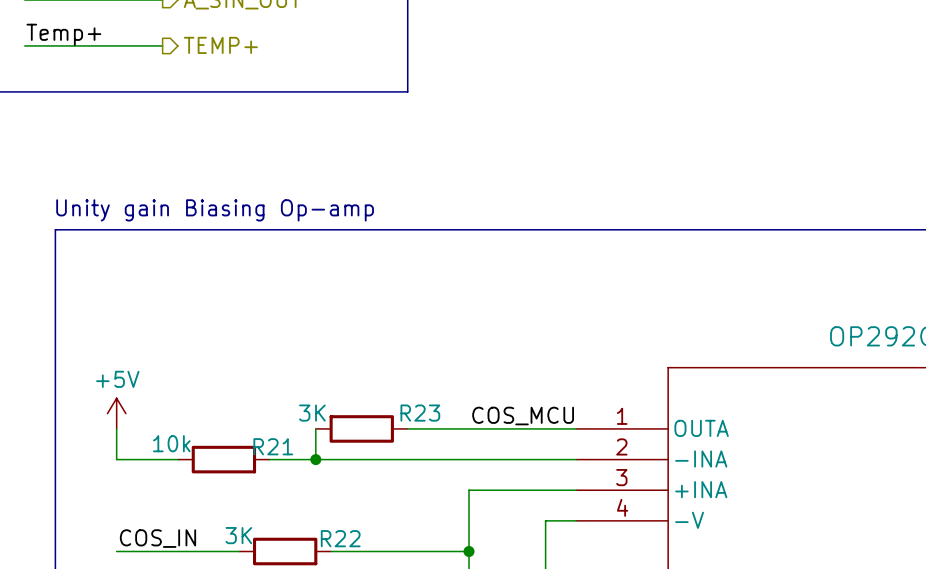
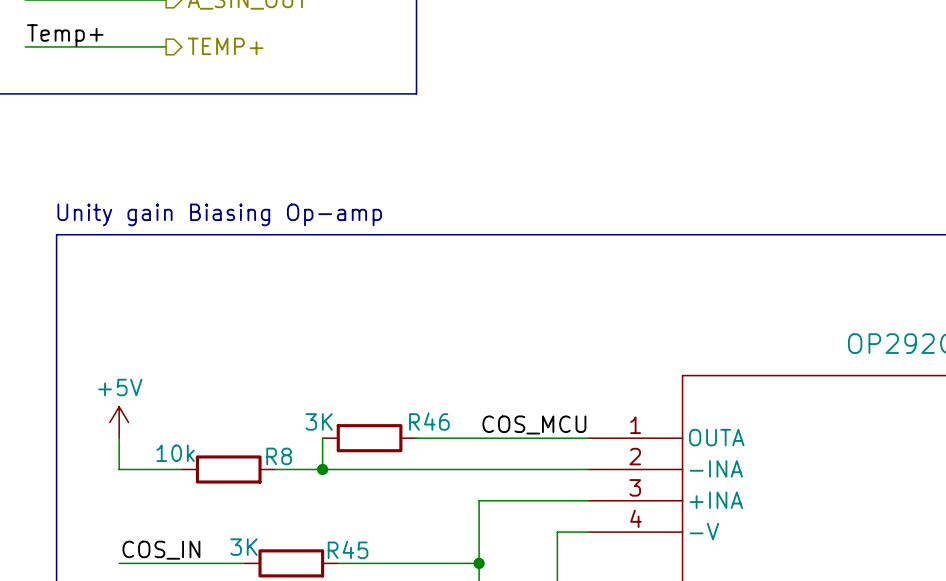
R23 name: R23 (420, 413) -> R46 (429, 421)
R21 name: R21 (273, 446) -> R8 (279, 456)
R22 name: R22 (340, 538) -> R45 (348, 549)

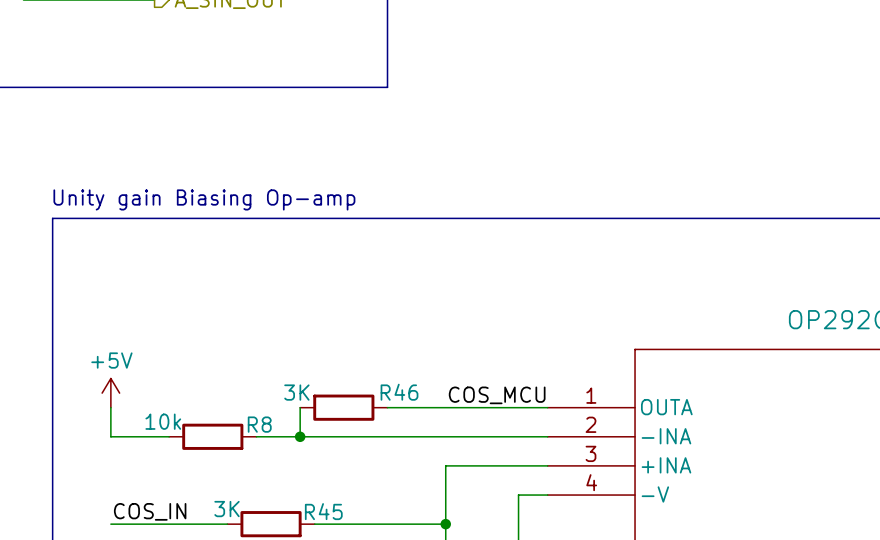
label: Temp+ (65, 35) -> none
wire: (25, 46) (166, 46) -> none
hierarchical label: TEMP+ (225, 46) -> none

